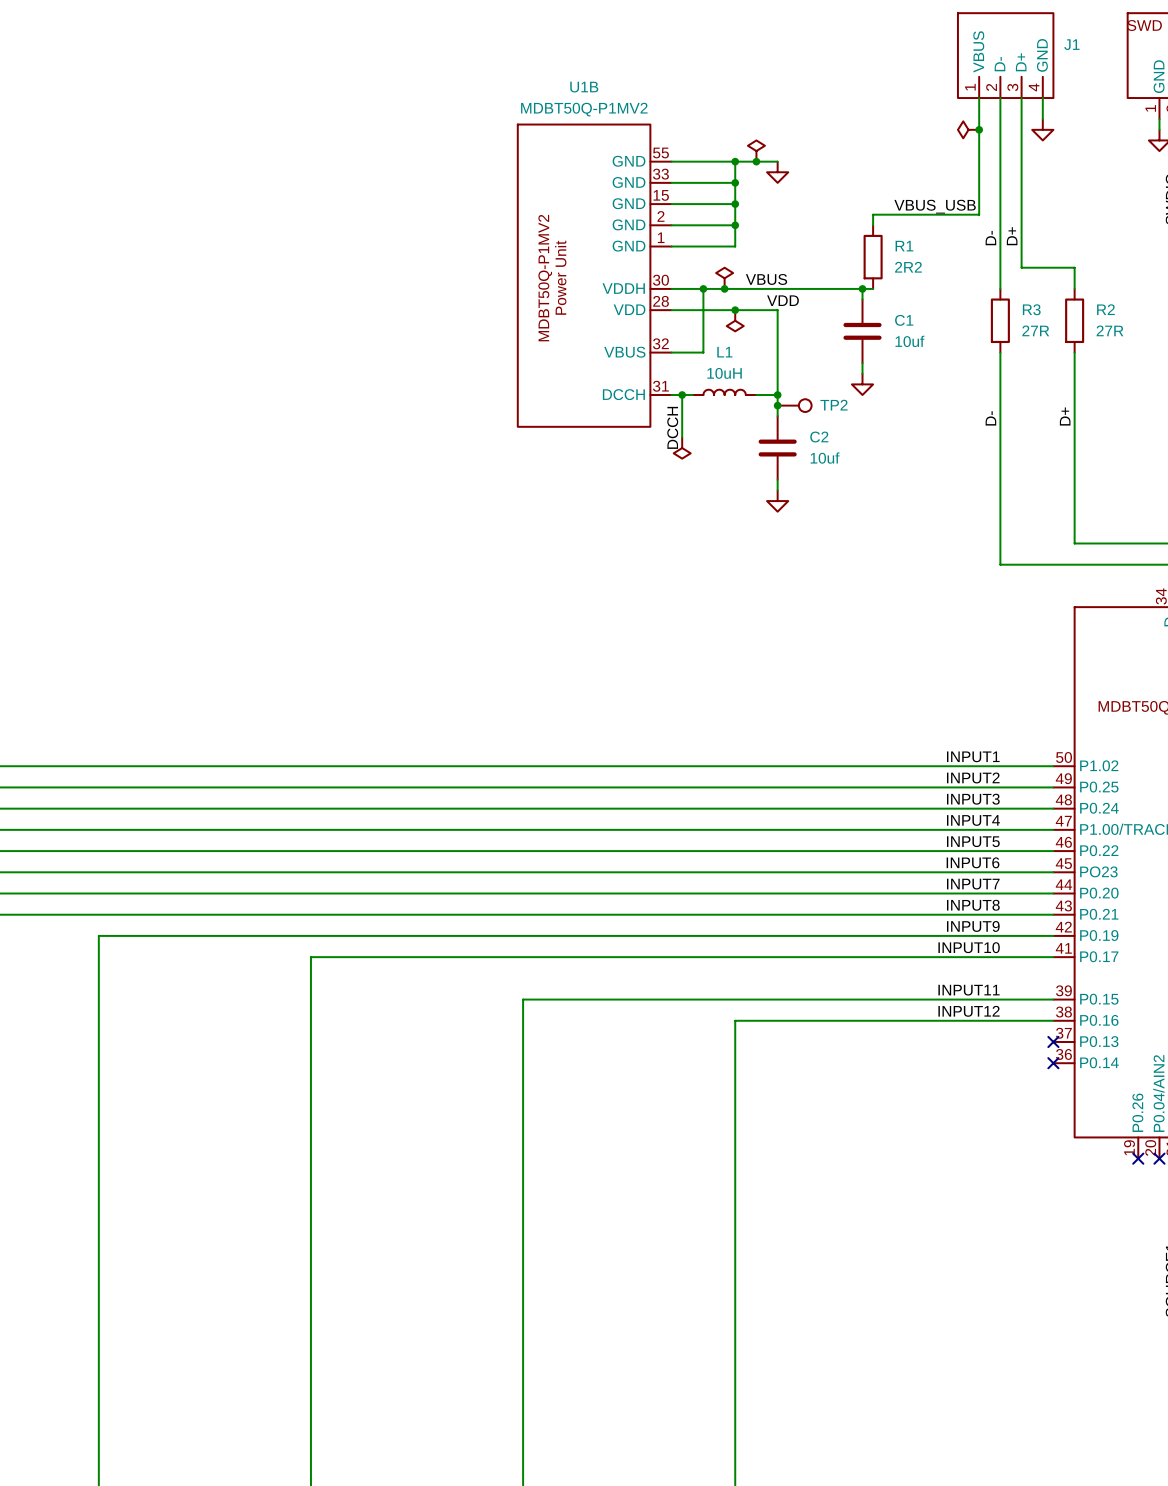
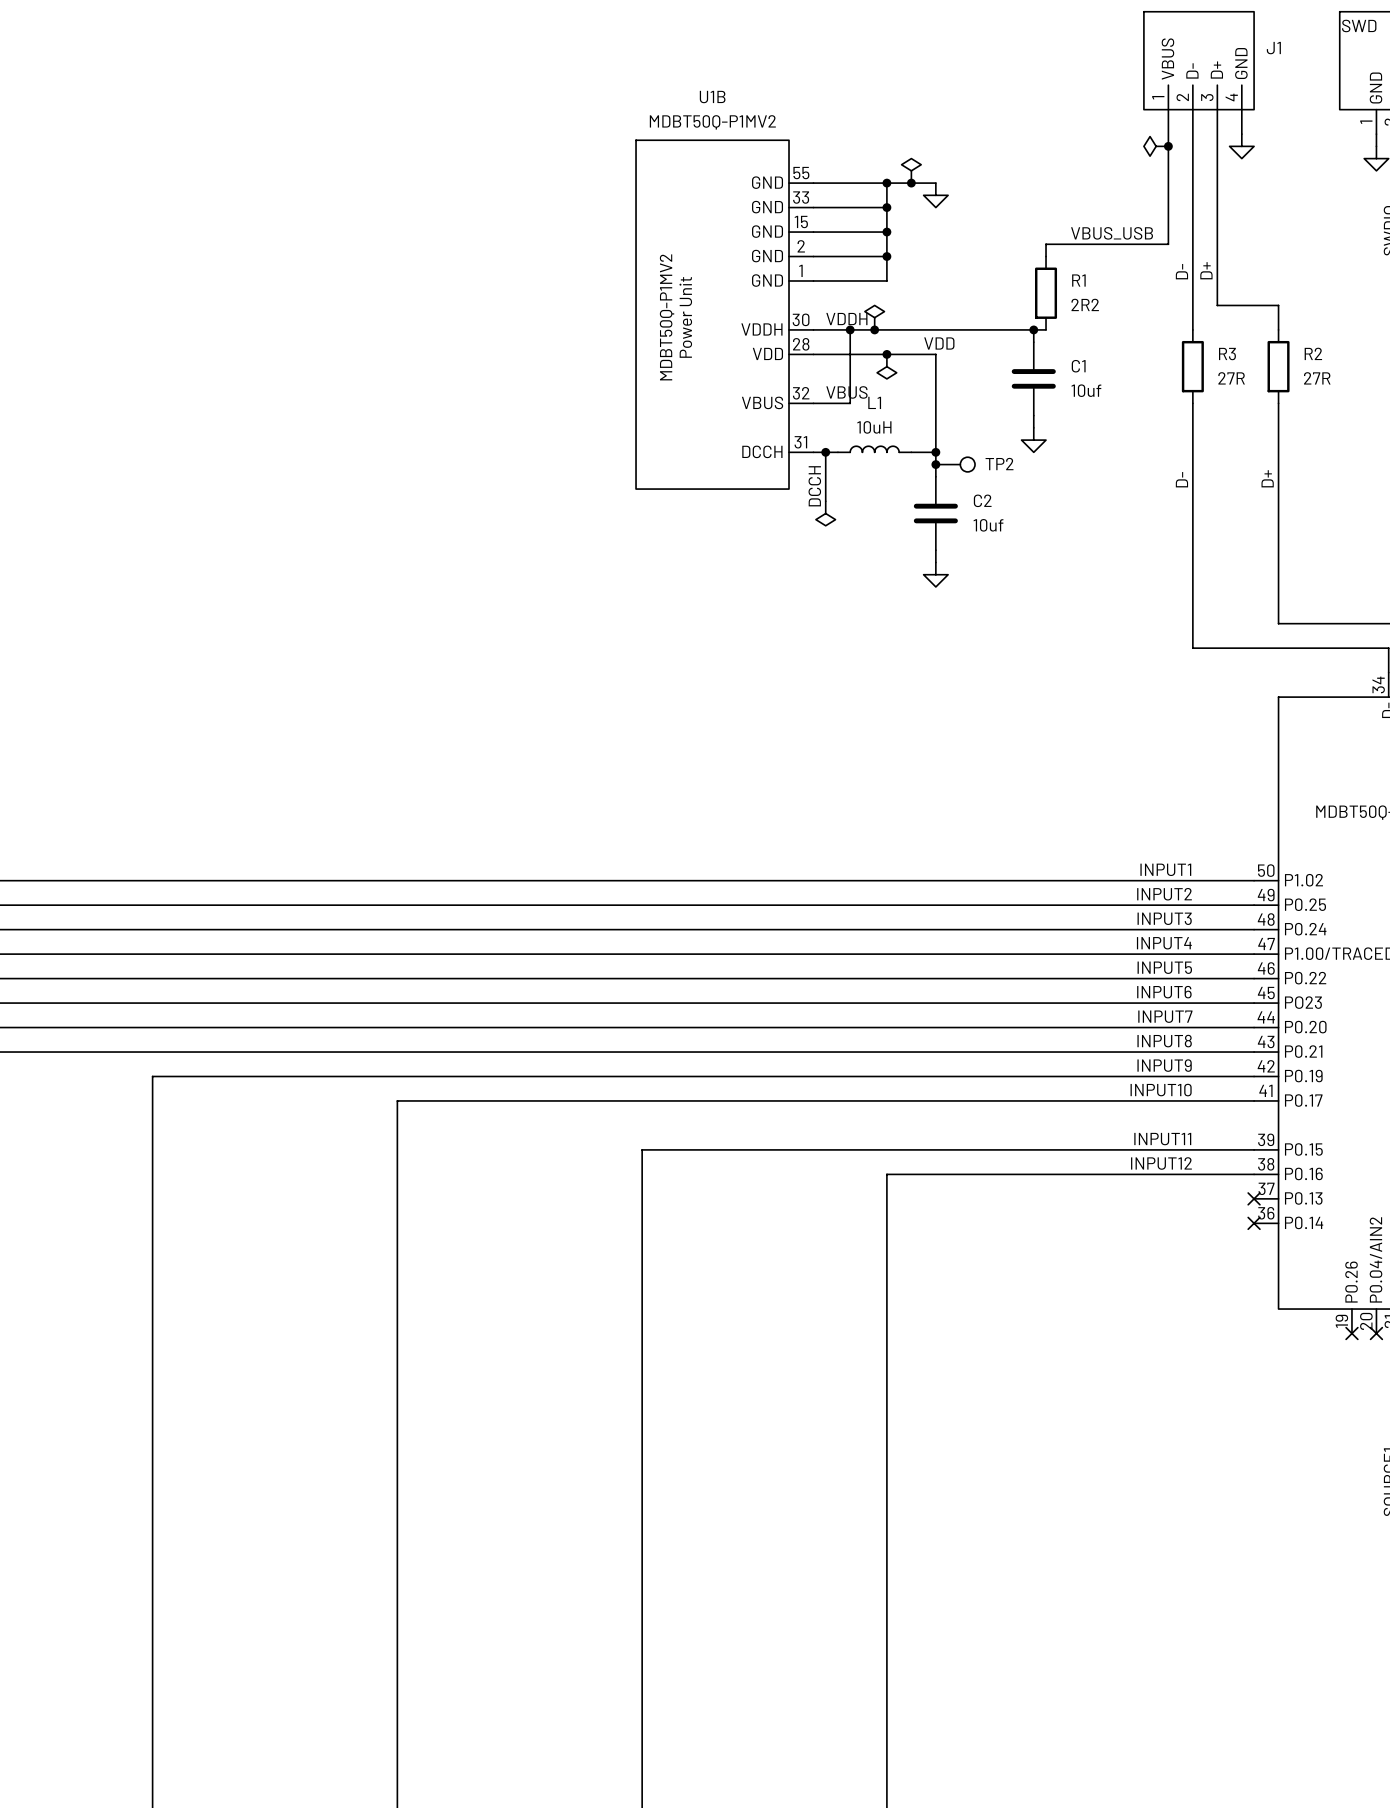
label: none -> VDDH (846, 319)
label position: VBUS (766, 279) -> VBUS (846, 392)

